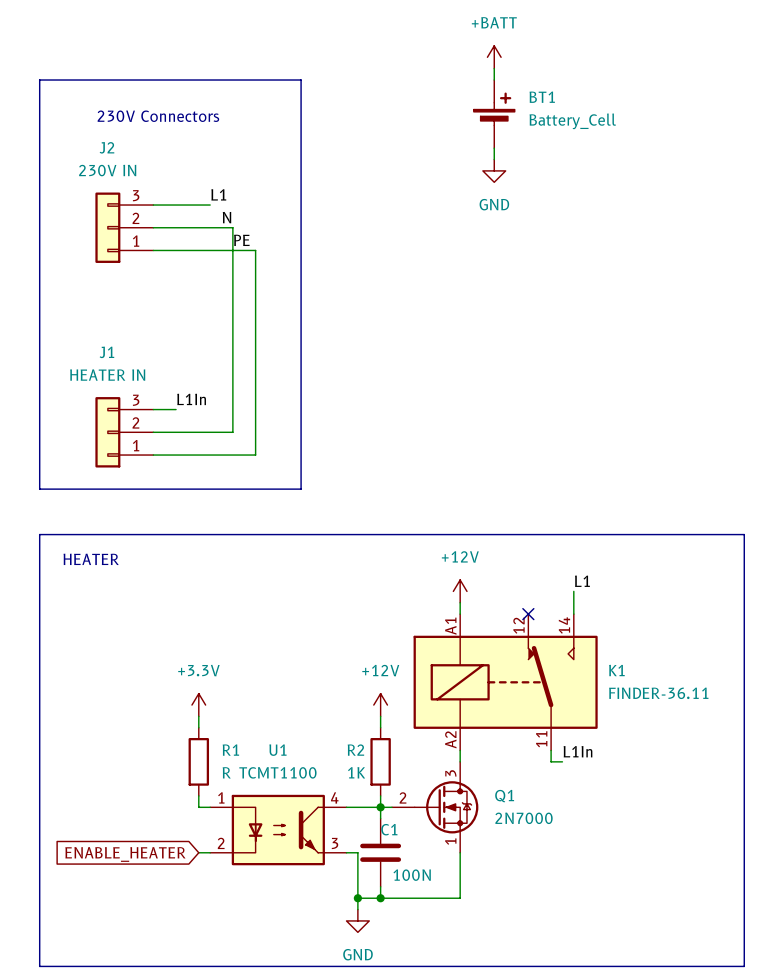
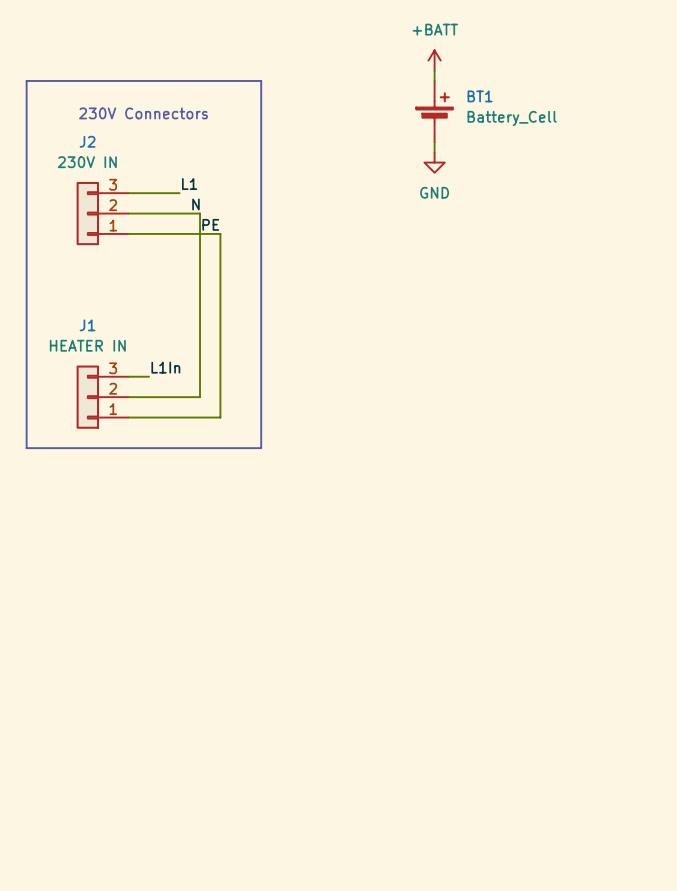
line: (39, 534) (744, 534) (744, 966) (39, 966) (39, 534) -> none
text: HEATER (91, 559) -> none
label: L1 (582, 581) -> none
power symbol: +12V (460, 591) -> none
wire: (573, 591) (573, 614) -> none
wire: (460, 602) (460, 614) -> none
no-connect mark: (528, 614) -> none
K1: FINDER-36.11 (505, 682) -> none
power symbol: +3.3V (198, 705) -> none
power symbol: +12V (380, 705) -> none
wire: (198, 716) (198, 727) -> none
wire: (380, 716) (380, 727) -> none
wire: (460, 750) (460, 761) -> none
wire: (551, 750) (551, 761) (562, 761) -> none
label: L1In (578, 751) -> none
R1: R (198, 761) -> none
R2: 1K (380, 761) -> none
wire: (198, 795) (198, 807) (210, 807) -> none
wire: (380, 795) (380, 818) -> none
wire: (346, 807) (391, 807) -> none
junction: (380, 807) -> none
Q1: 2N7000 (435, 807) -> none
U1: TCMT1100 (278, 830) -> none
wire: (198, 852) (210, 852) -> none
wire: (346, 852) (357, 852) (357, 909) -> none
C1: 100N (380, 852) -> none
wire: (460, 852) (460, 898) (357, 898) -> none
global label: ENABLE_HEATER (125, 854) -> none
wire: (380, 886) (380, 898) -> none
junction: (357, 898) -> none
junction: (380, 898) -> none
power symbol: GND (357, 920) -> none

